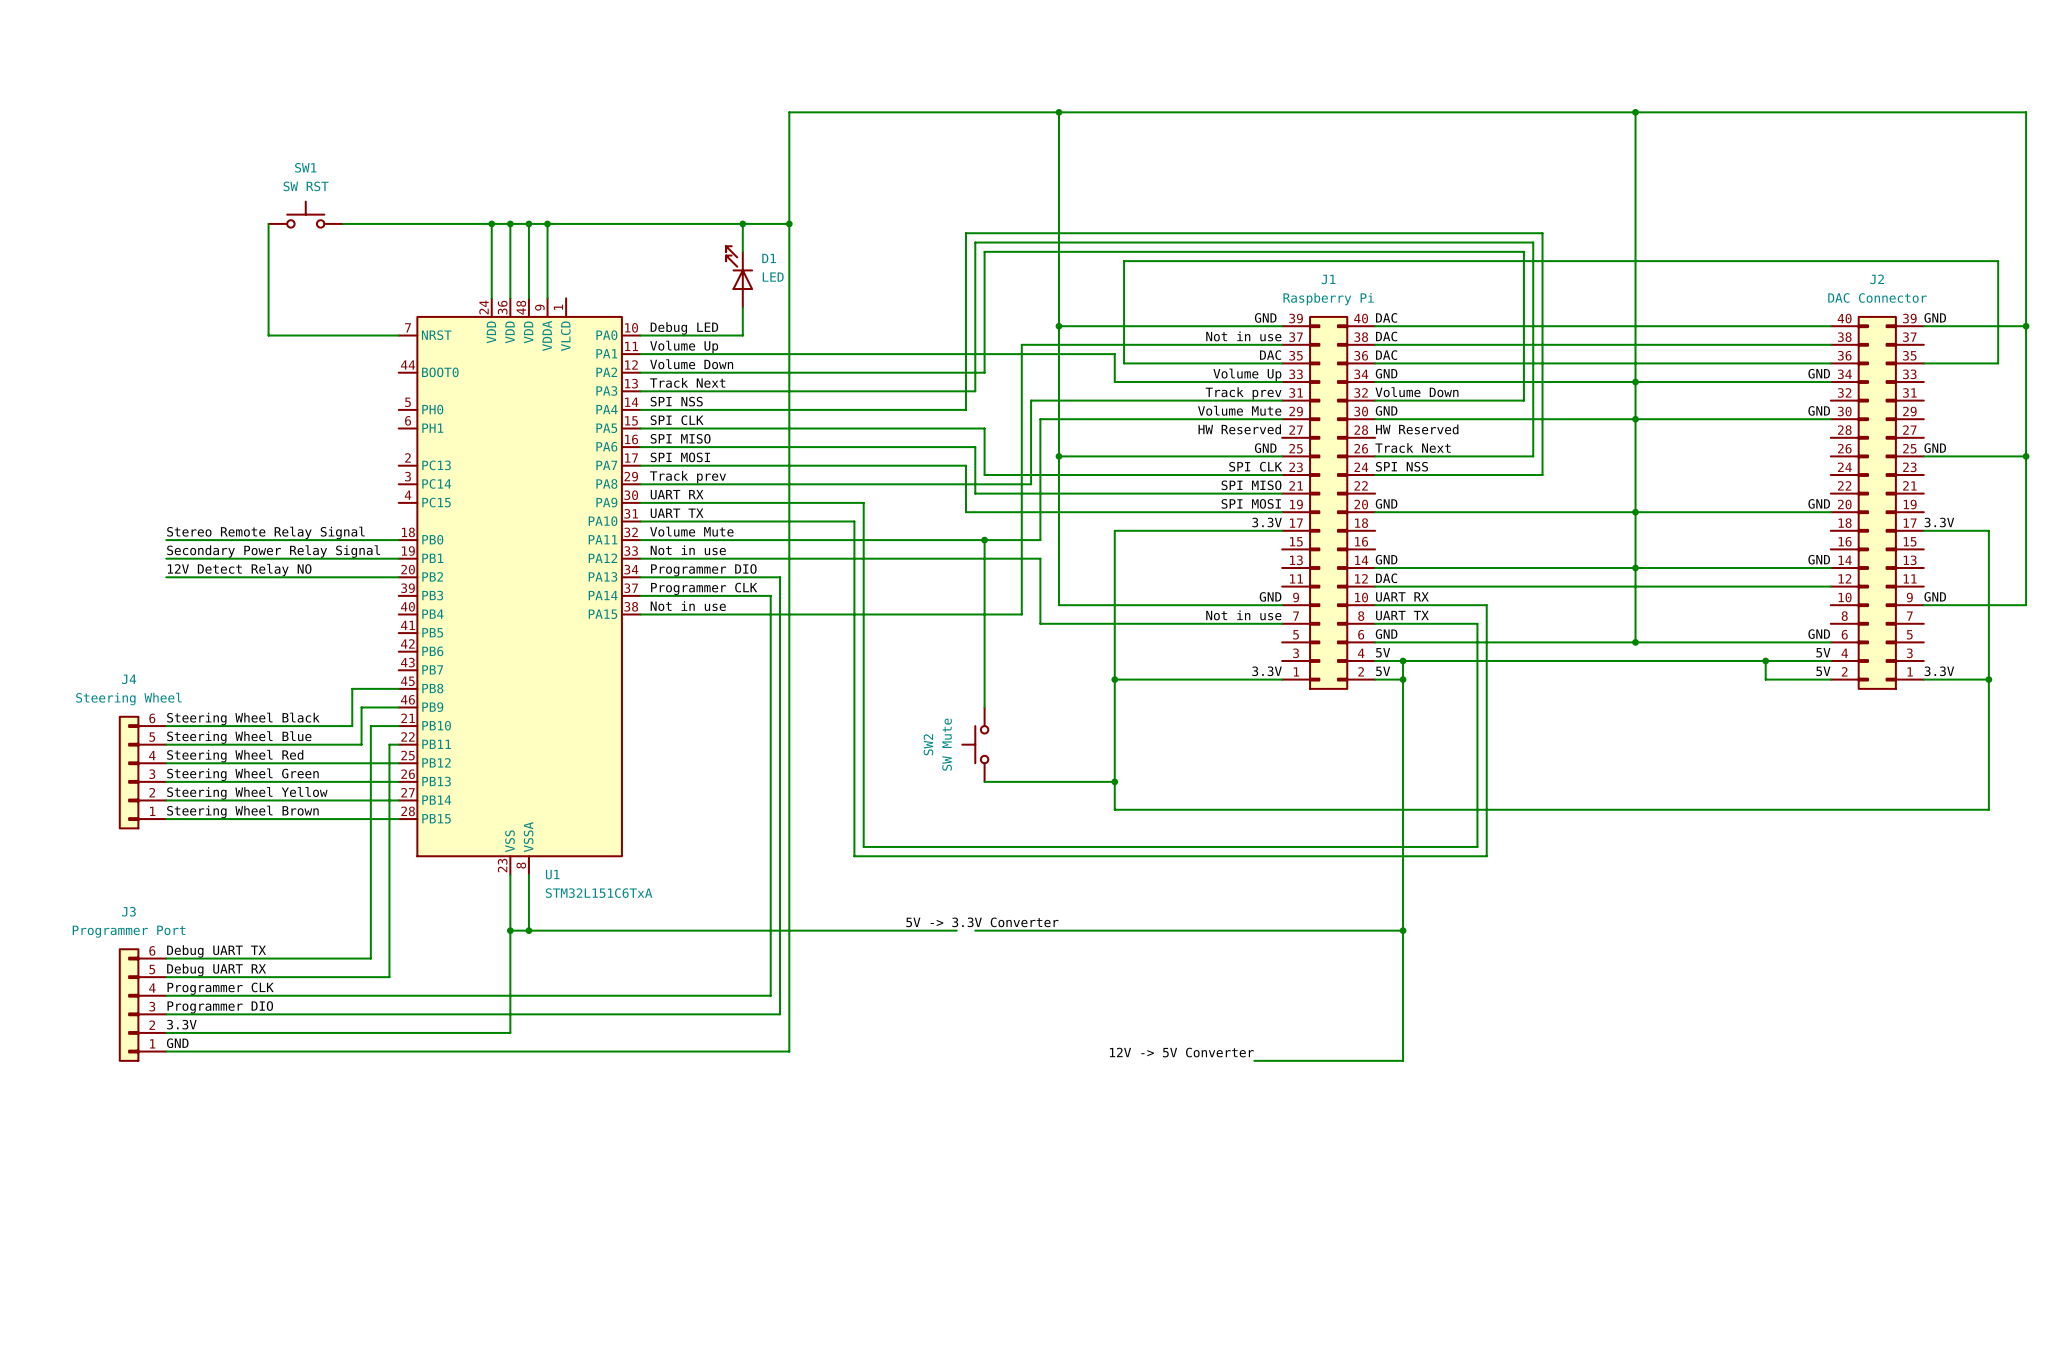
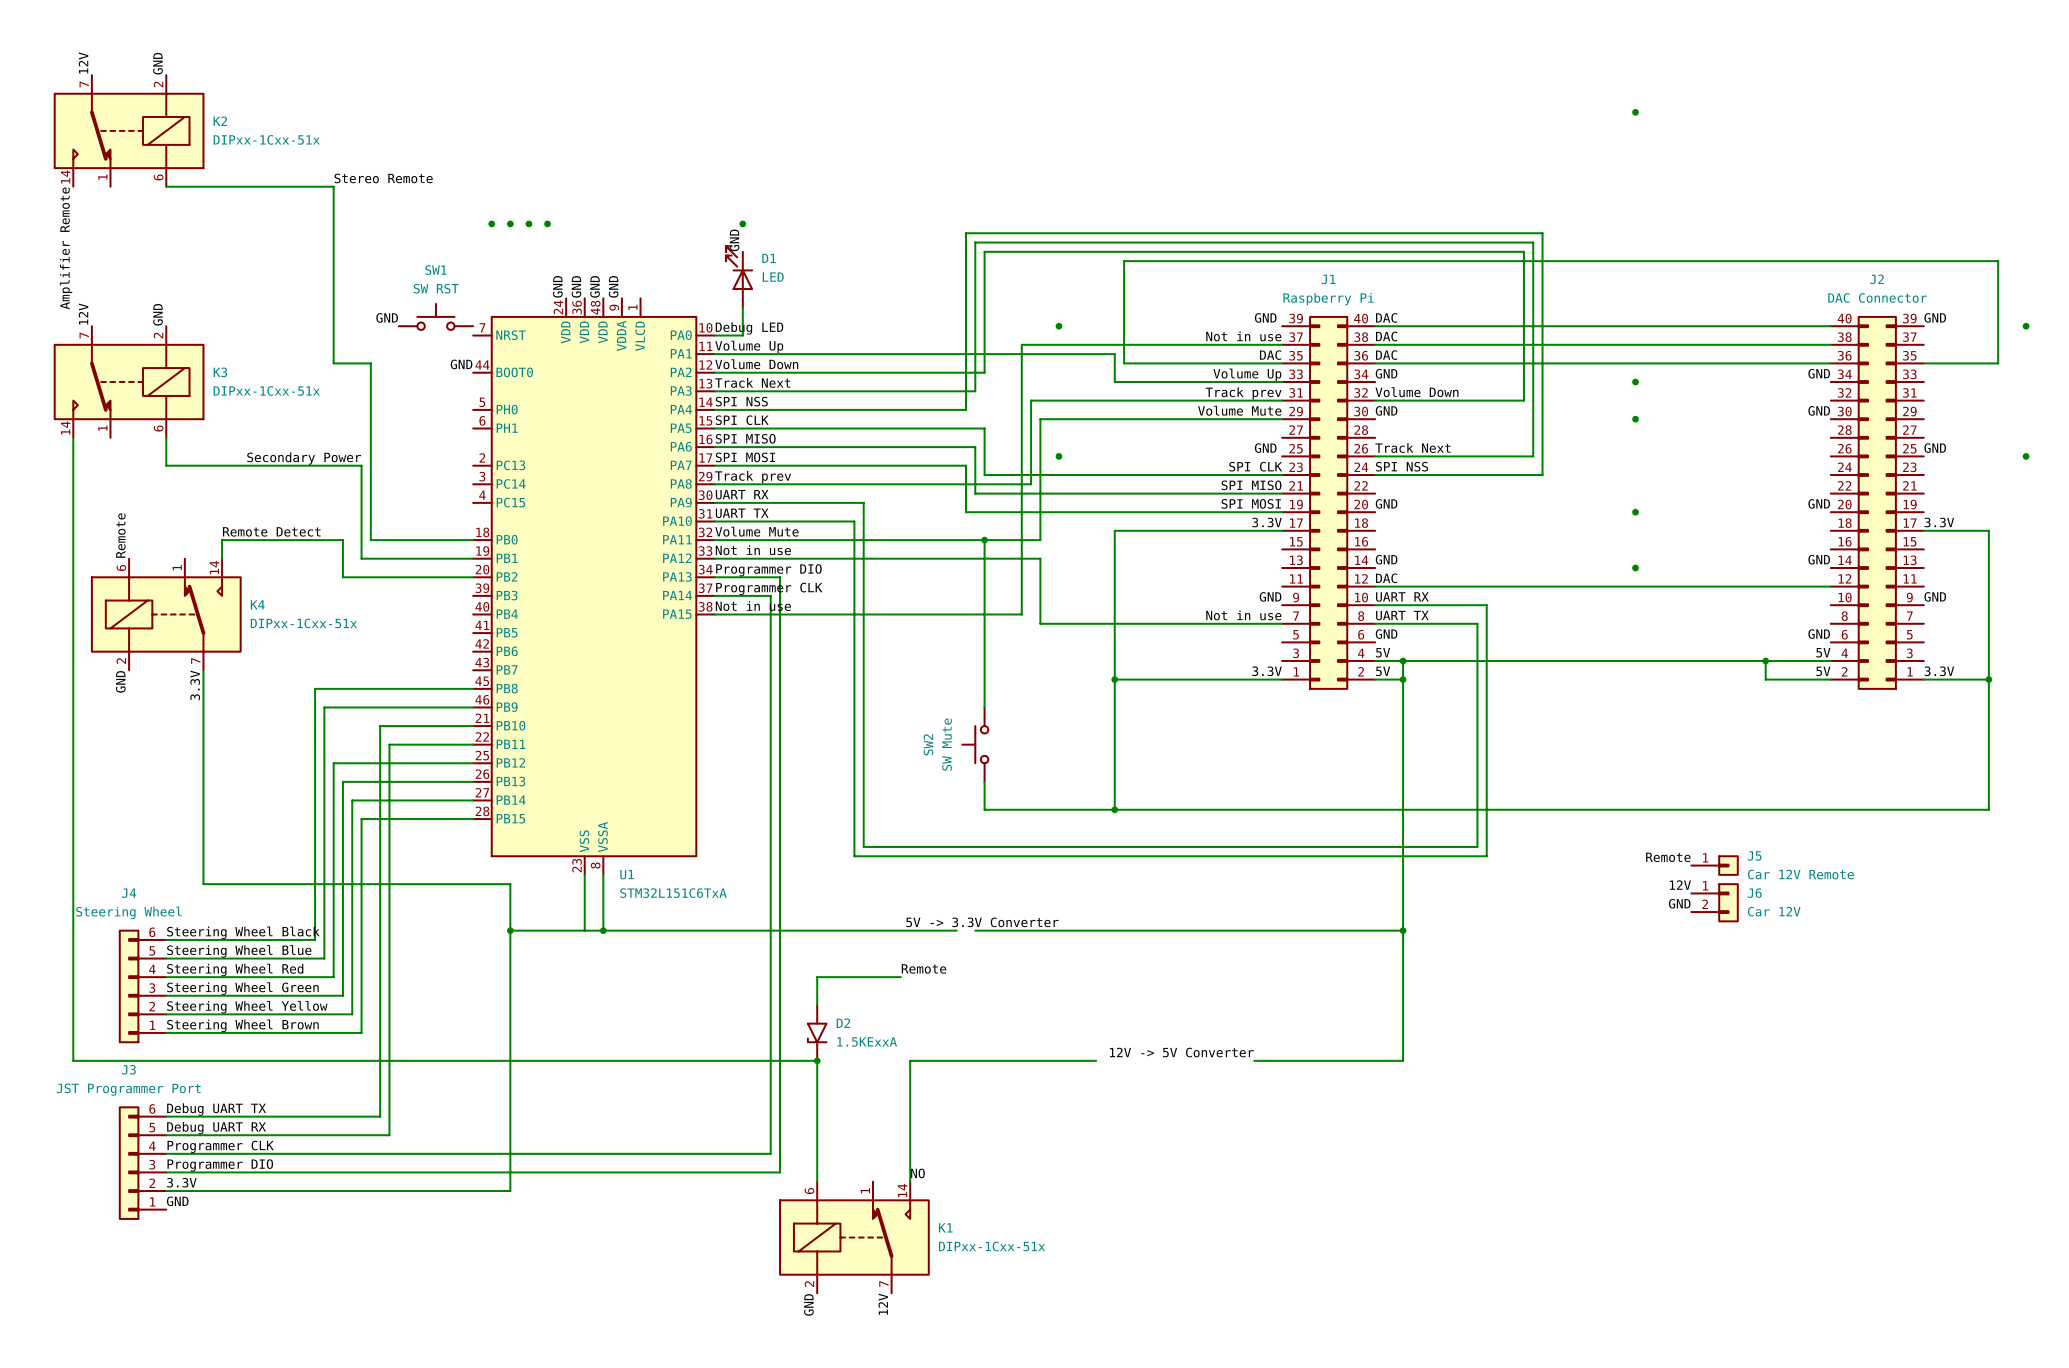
label: none -> 12V (83, 63)
label: none -> GND (157, 63)
wire: (1058, 112) (1058, 605) (1282, 605) -> none
junction: (1058, 112) -> none
wire: (1635, 112) (1635, 642) -> none
K2: none -> DIPxx-1Cxx-51x (129, 130)
label: none -> Stereo Remote (383, 178)
wire: none -> (166, 186) (333, 186) (333, 363) (370, 363) (370, 540)
SW1 position: (305, 214) -> (435, 316)
wire: (268, 223) (268, 335) (398, 335) -> none
wire: (342, 223) (789, 223) -> none
wire: (491, 223) (491, 298) -> none
wire: (510, 223) (510, 298) -> none
wire: (528, 223) (528, 298) -> none
wire: (547, 223) (547, 298) -> none
wire: (742, 223) (742, 251) -> none
junction: (789, 223) -> none
label: none -> GND (734, 240)
label: none -> Amplifier Remote (66, 248)
label: none -> GND (557, 286)
label: none -> GND (576, 286)
label: none -> GND (595, 286)
label: none -> GND (613, 286)
label: none -> 12V (83, 314)
label: none -> GND (157, 314)
label: none -> GND (387, 317)
wire: (1058, 326) (1282, 326) -> none
wire: (1923, 326) (2026, 326) -> none
label position: Debug LED (684, 328) -> Debug LED (749, 328)
label position: Volume Up (684, 346) -> Volume Up (749, 346)
label: none -> GND (461, 364)
label position: Volume Down (691, 364) -> Volume Down (756, 364)
K3: none -> DIPxx-1Cxx-51x (129, 382)
label position: Track Next (687, 382) -> Track Next (752, 382)
wire: (1375, 382) (1830, 382) -> none
label position: SPI NSS (676, 401) -> SPI NSS (741, 401)
wire: (1375, 419) (1830, 419) -> none
label position: SPI CLK (677, 420) -> SPI CLK (742, 420)
label: HW Reserved (1239, 429) -> none
label: HW Reserved (1417, 429) -> none
wire: none -> (73, 437) (73, 1060) (817, 1060) (817, 1181)
label position: SPI MISO (680, 438) -> SPI MISO (745, 438)
wire: (1058, 456) (1282, 456) -> none
wire: (1923, 456) (2026, 456) -> none
label position: SPI MOSI (680, 457) -> SPI MOSI (745, 457)
label: none -> Secondary Power (304, 458)
label position: Track prev (688, 477) -> Track prev (753, 477)
label position: UART RX (677, 494) -> UART RX (742, 494)
wire: (1375, 512) (1830, 512) -> none
label position: UART TX (677, 513) -> UART TX (742, 513)
label: none -> Remote Detect (271, 531)
label position: Volume Mute (691, 531) -> Volume Mute (756, 531)
label: Stereo Remote Relay Signal (265, 532) -> none
label: none -> Remote (120, 535)
wire: (166, 540) (222, 540) -> (222, 558) (222, 540)
wire: (342, 540) (370, 540) -> (342, 540) (342, 577)
label position: Not in use (688, 550) -> Not in use (753, 550)
label: Secondary Power Relay Signal (273, 551) -> none
wire: (166, 558) (361, 558) -> (166, 437) (166, 465) (361, 465) (361, 558)
wire: (1375, 567) (1830, 567) -> none
label: 12V Detect Relay NO (239, 570) -> none
label position: Programmer DIO (703, 570) -> Programmer DIO (768, 570)
wire: (166, 577) (342, 577) -> none
U1 position: (519, 586) -> (594, 586)
label position: Programmer CLK (704, 588) -> Programmer CLK (769, 588)
wire: (1923, 605) (2026, 605) (2026, 112) (789, 112) (789, 1051) (166, 1051) -> none
label position: Not in use (688, 606) -> Not in use (753, 606)
K4: none -> DIPxx-1Cxx-51x (166, 614)
wire: (1375, 642) (1830, 642) -> none
junction: (1635, 642) -> none
label: none -> GND (120, 681)
label: none -> 3.3V (195, 685)
wire: (352, 688) (352, 726) (166, 726) -> (352, 688) (315, 688) (315, 939) (166, 939)
wire: (361, 707) (361, 744) (166, 744) -> none
label: Steering Wheel Black (243, 718) -> none
wire: (380, 726) (370, 726) (370, 958) (324, 958) -> (361, 707) (324, 707) (324, 958)
wire: none -> (380, 726) (380, 1116) (166, 1116)
label: Steering Wheel Blue (239, 737) -> none
label: Steering Wheel Red (235, 756) -> none
wire: (166, 763) (333, 763) -> none
J4 position: (142, 772) -> (142, 986)
label: Steering Wheel Green (242, 774) -> none
wire: (166, 781) (342, 781) -> (342, 995) (342, 781)
wire: (984, 781) (1114, 781) -> (984, 781) (984, 809) (1114, 809)
junction position: (1114, 781) -> (1114, 809)
label: Steering Wheel Yellow (247, 793) -> none
wire: (166, 800) (352, 800) -> (352, 1014) (352, 800)
label: Steering Wheel Brown (242, 811) -> none
wire: (166, 819) (361, 819) -> (361, 1032) (361, 819)
label: none -> Remote (1668, 857)
J5: none -> Car 12V Remote (1715, 865)
wire: (510, 874) (510, 884) -> (203, 670) (203, 884) (510, 884)
wire: (528, 874) (528, 930) -> (584, 874) (584, 930)
wire: none -> (603, 874) (603, 930)
label: none -> 12V (1680, 885)
J6: none -> Car 12V (1715, 902)
label: none -> GND (1679, 903)
junction: (528, 930) -> none
junction: none -> (603, 930)
J3 value: Programmer Port (129, 931) -> JST Programmer Port (128, 1089)
label: none -> Steering Wheel Black (243, 932)
label: Debug UART TX (216, 951) -> Steering Wheel Blue (239, 951)
label: none -> Remote (924, 968)
label: Debug UART RX (216, 970) -> Steering Wheel Red (235, 969)
wire: (333, 977) (389, 977) -> (333, 977) (333, 763)
wire: none -> (389, 977) (389, 1135) (166, 1135)
wire: none -> (900, 977) (817, 977) (817, 1005)
label: Programmer CLK (220, 988) -> Steering Wheel Green (242, 988)
wire: (342, 995) (770, 995) -> (166, 1153) (770, 1153) (770, 995)
J3 position: (142, 1005) -> (142, 1163)
label: Programmer DIO (220, 1007) -> Steering Wheel Yellow (247, 1007)
wire: (352, 1014) (780, 1014) -> (166, 1172) (780, 1172) (780, 1014)
label: 3.3V (181, 1024) -> Steering Wheel Brown (242, 1025)
wire: (361, 1032) (510, 1032) -> (166, 1191) (510, 1191) (510, 1032)
D2: none -> 1.5KExxA (817, 1032)
label position: GND (177, 1043) -> GND (177, 1201)
junction: none -> (817, 1060)
wire: none -> (1096, 1060) (910, 1060) (910, 1181)
label: none -> Debug UART TX (216, 1109)
label: none -> Debug UART RX (216, 1128)
label: none -> Programmer CLK (220, 1146)
label: none -> Programmer DIO (220, 1165)
label: none -> NO (917, 1173)
label: none -> 3.3V (181, 1182)
K1: none -> DIPxx-1Cxx-51x (854, 1237)
label: none -> GND (808, 1304)
label: none -> 12V (883, 1304)

